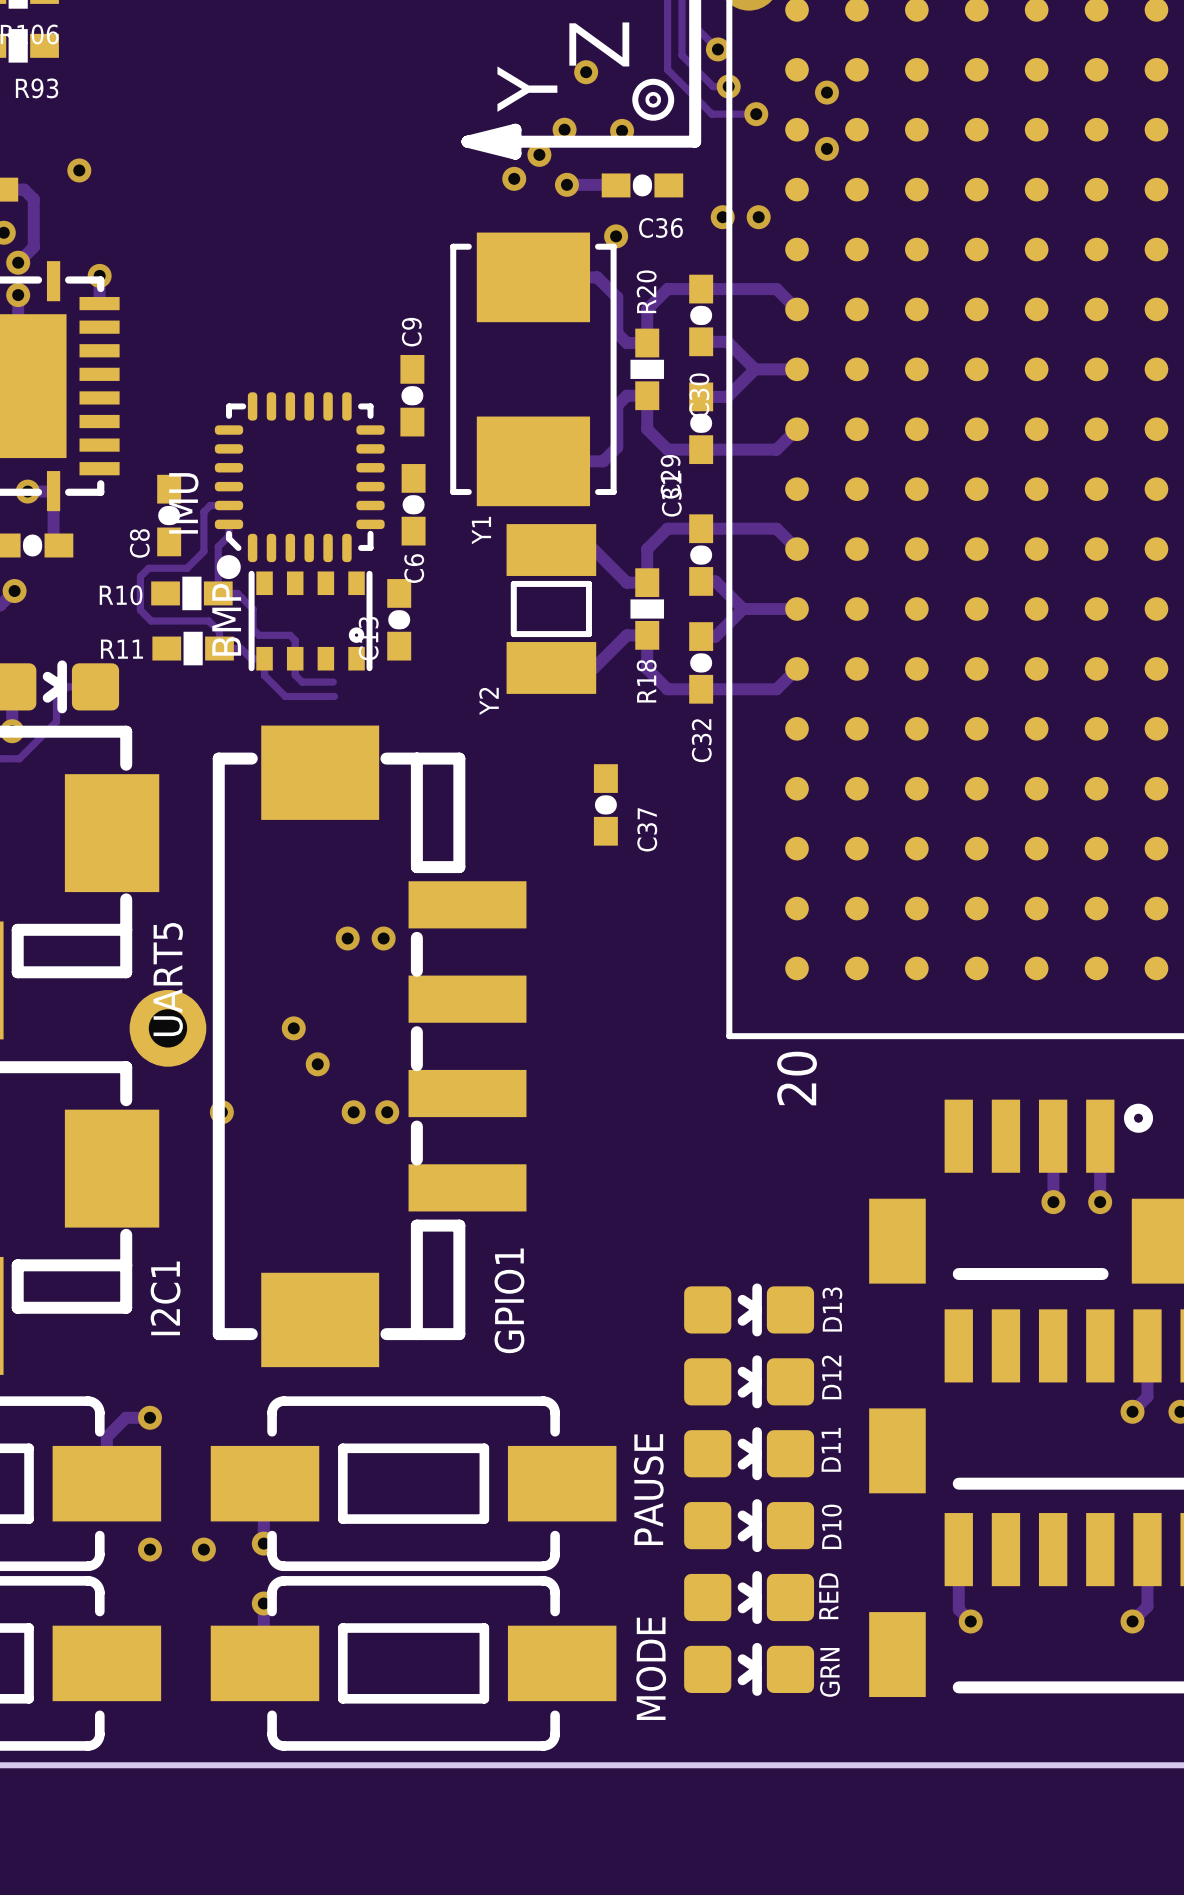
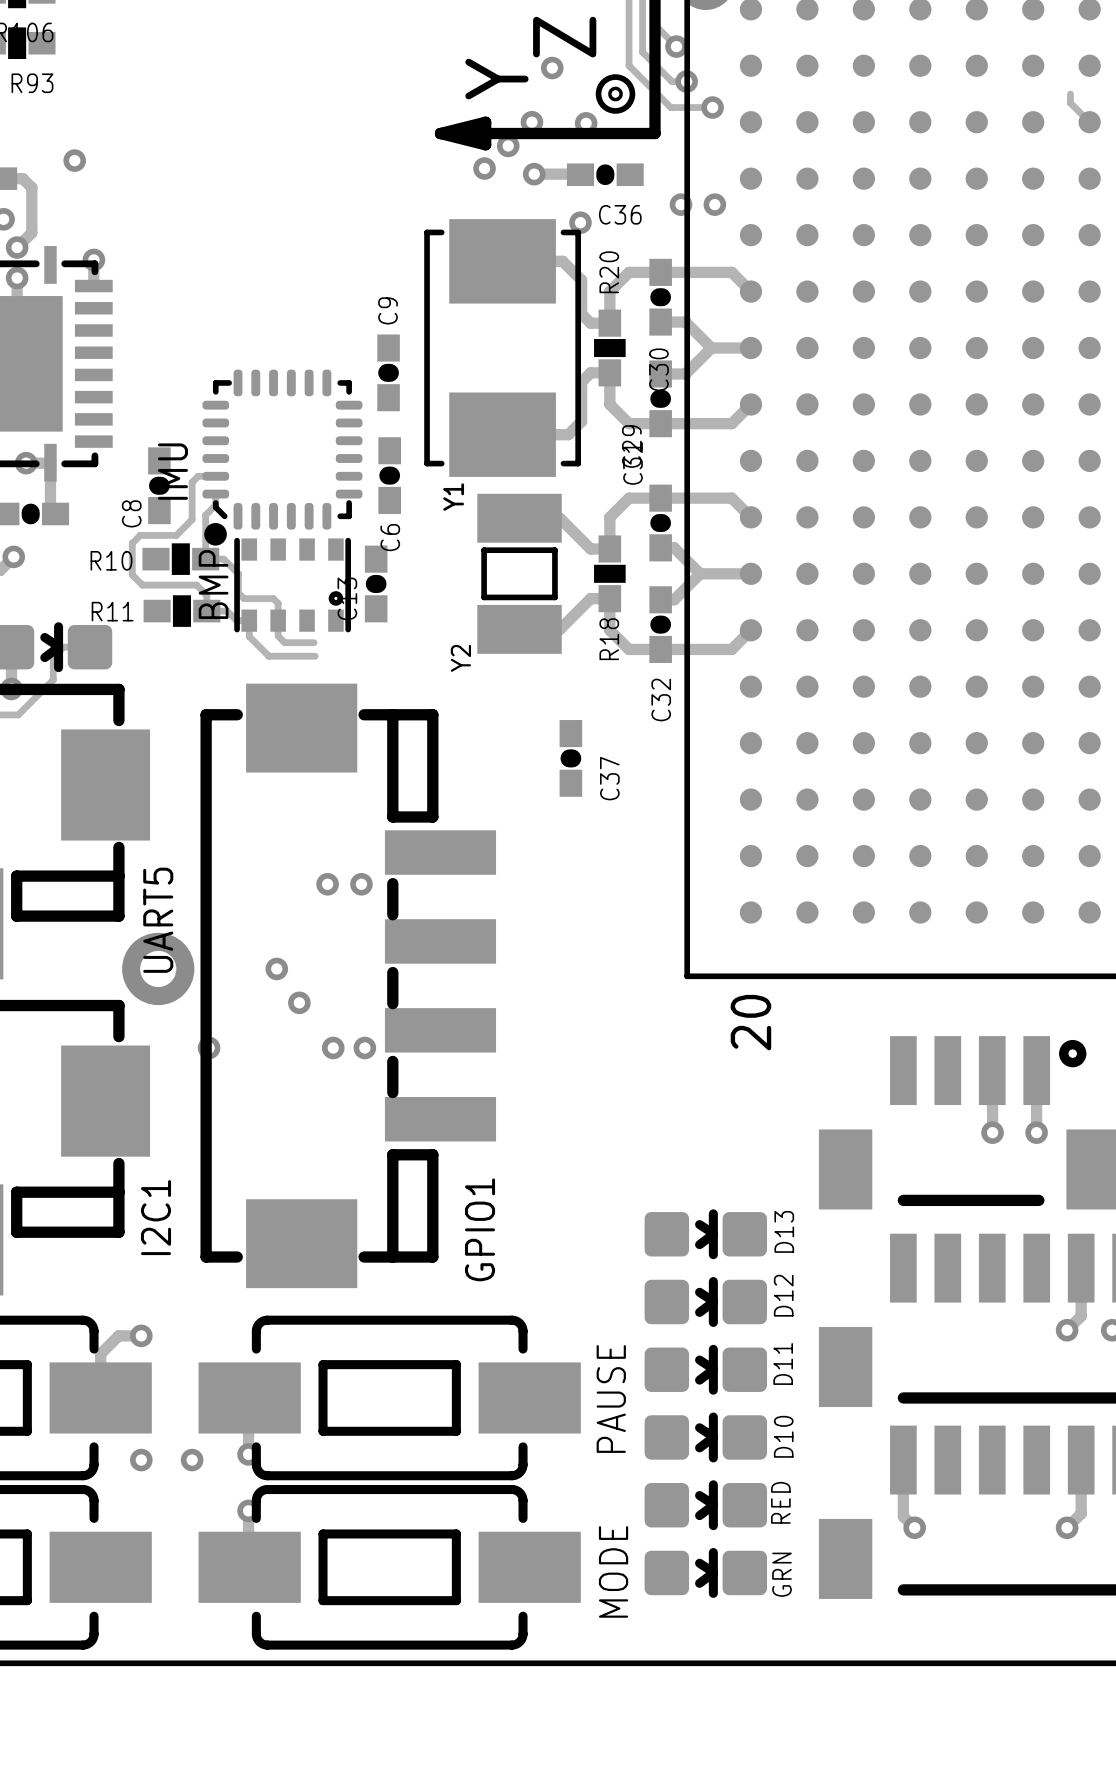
via: (826, 92) -> none
track: none -> (1070, 94) (1070, 103) (1089, 122)
via: (826, 148) -> none

